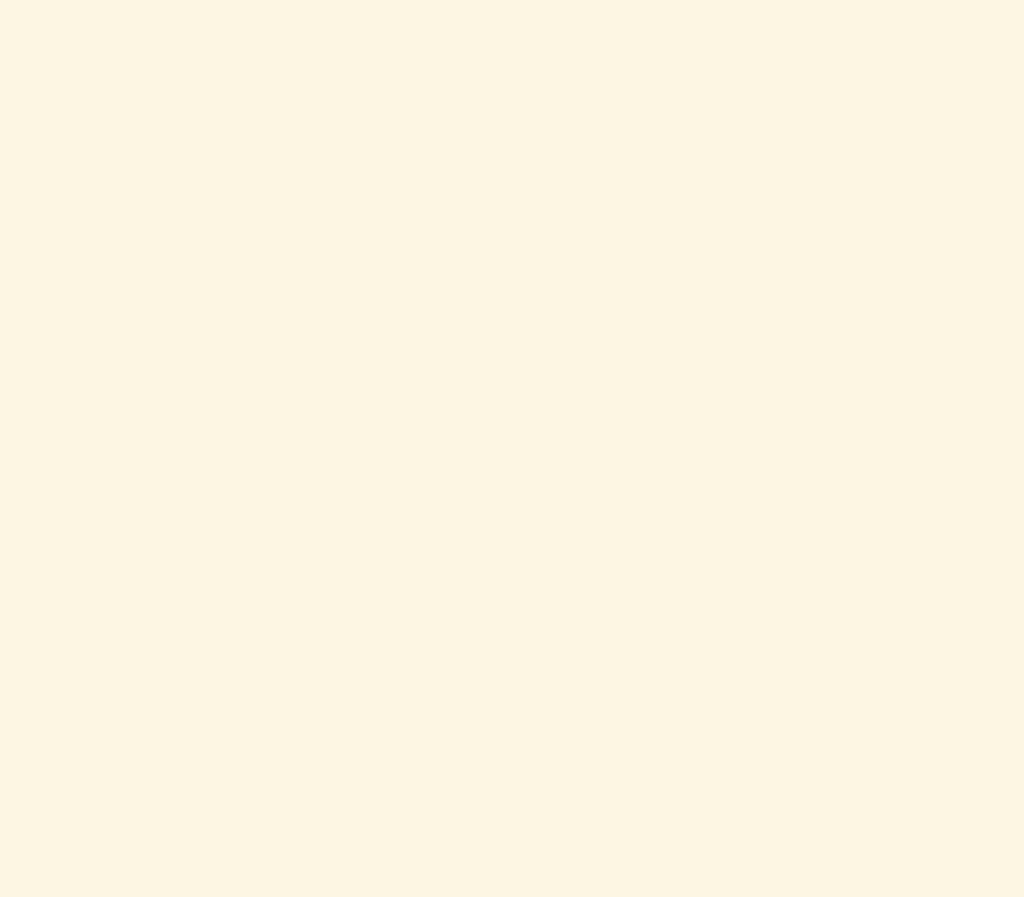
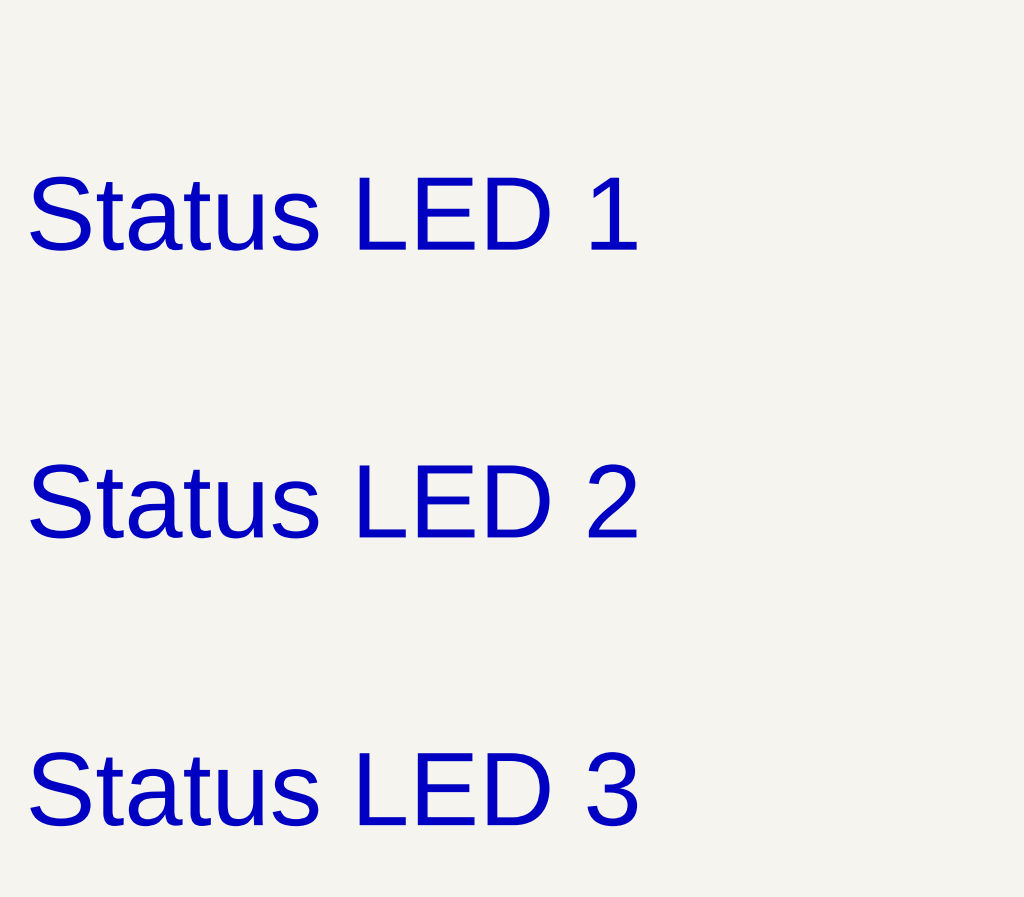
text: none -> Status LED 1 (333, 213)
text: none -> Status LED 2 (333, 501)
text: none -> Status LED 3 (333, 789)

